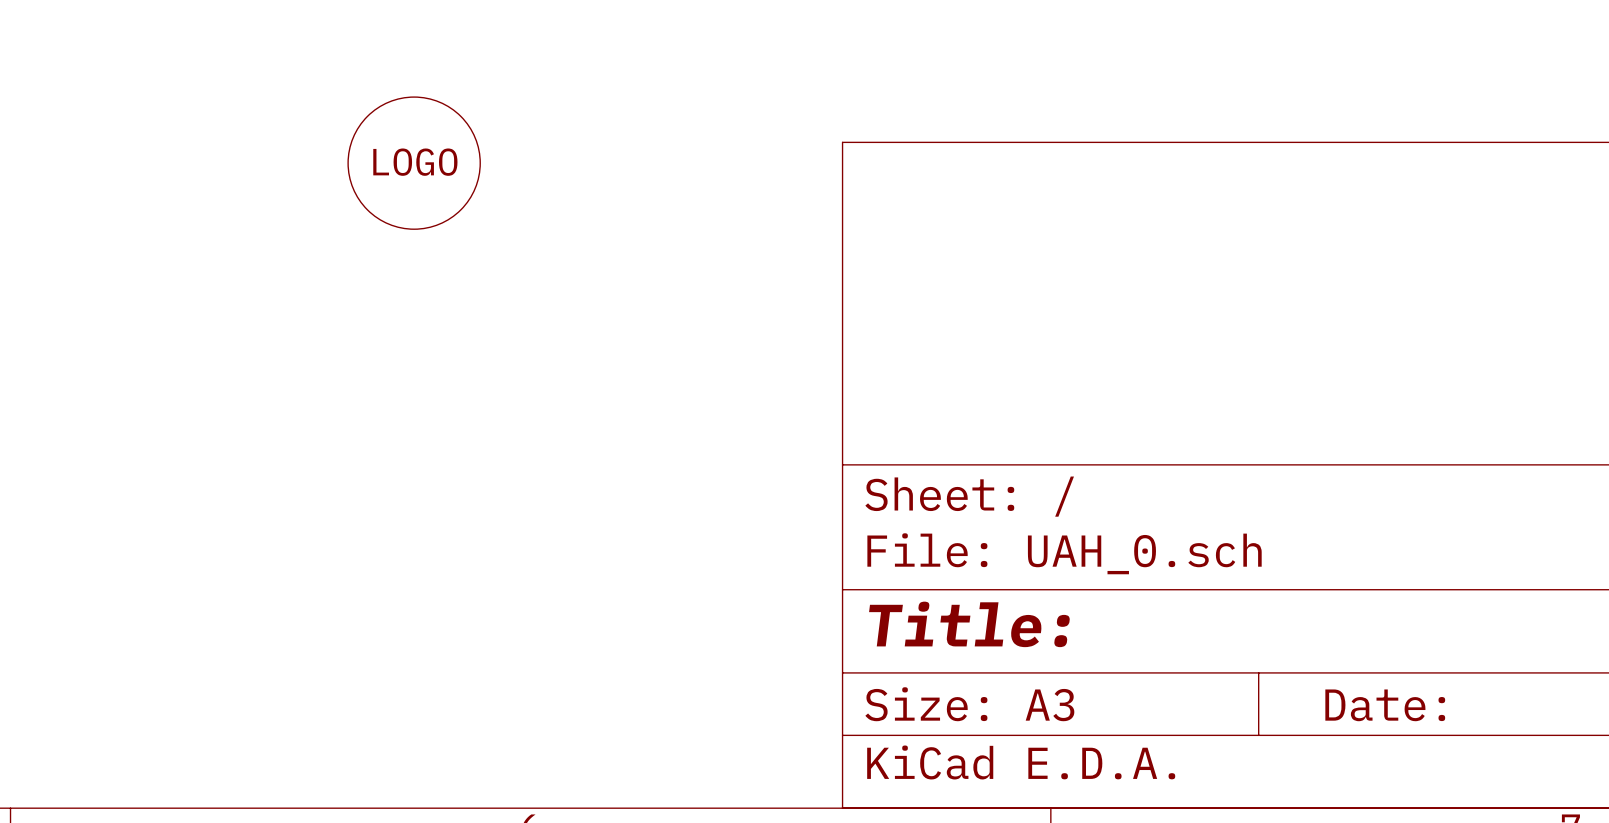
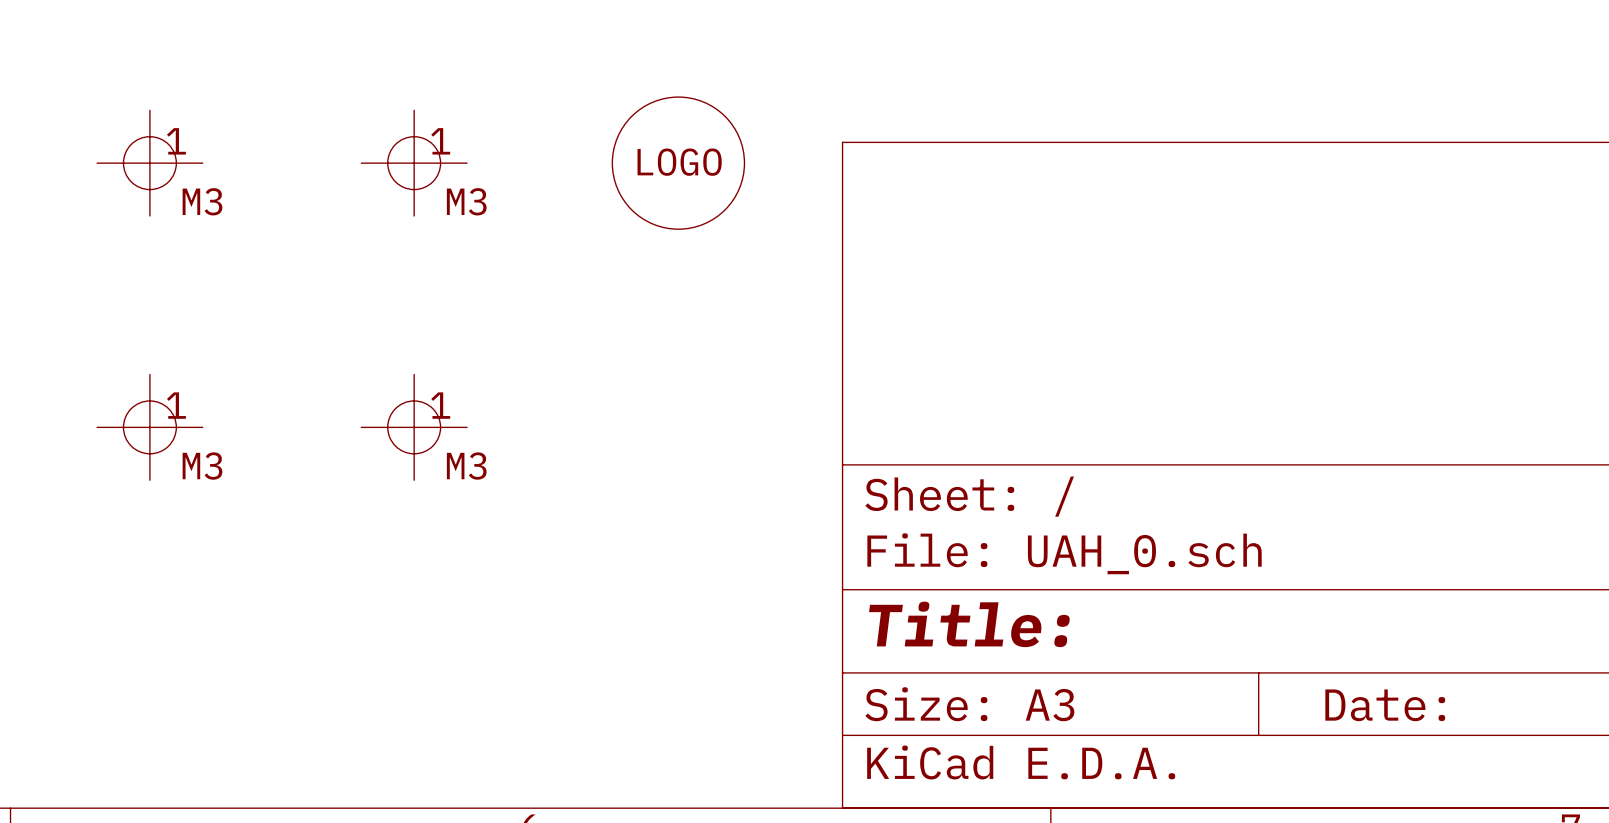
part symbol: [348, 97, 481, 230] -> [361, 110, 468, 216]
part: none -> (149, 163)
part: none -> (678, 163)
part: none -> (149, 427)
part: none -> (414, 427)

